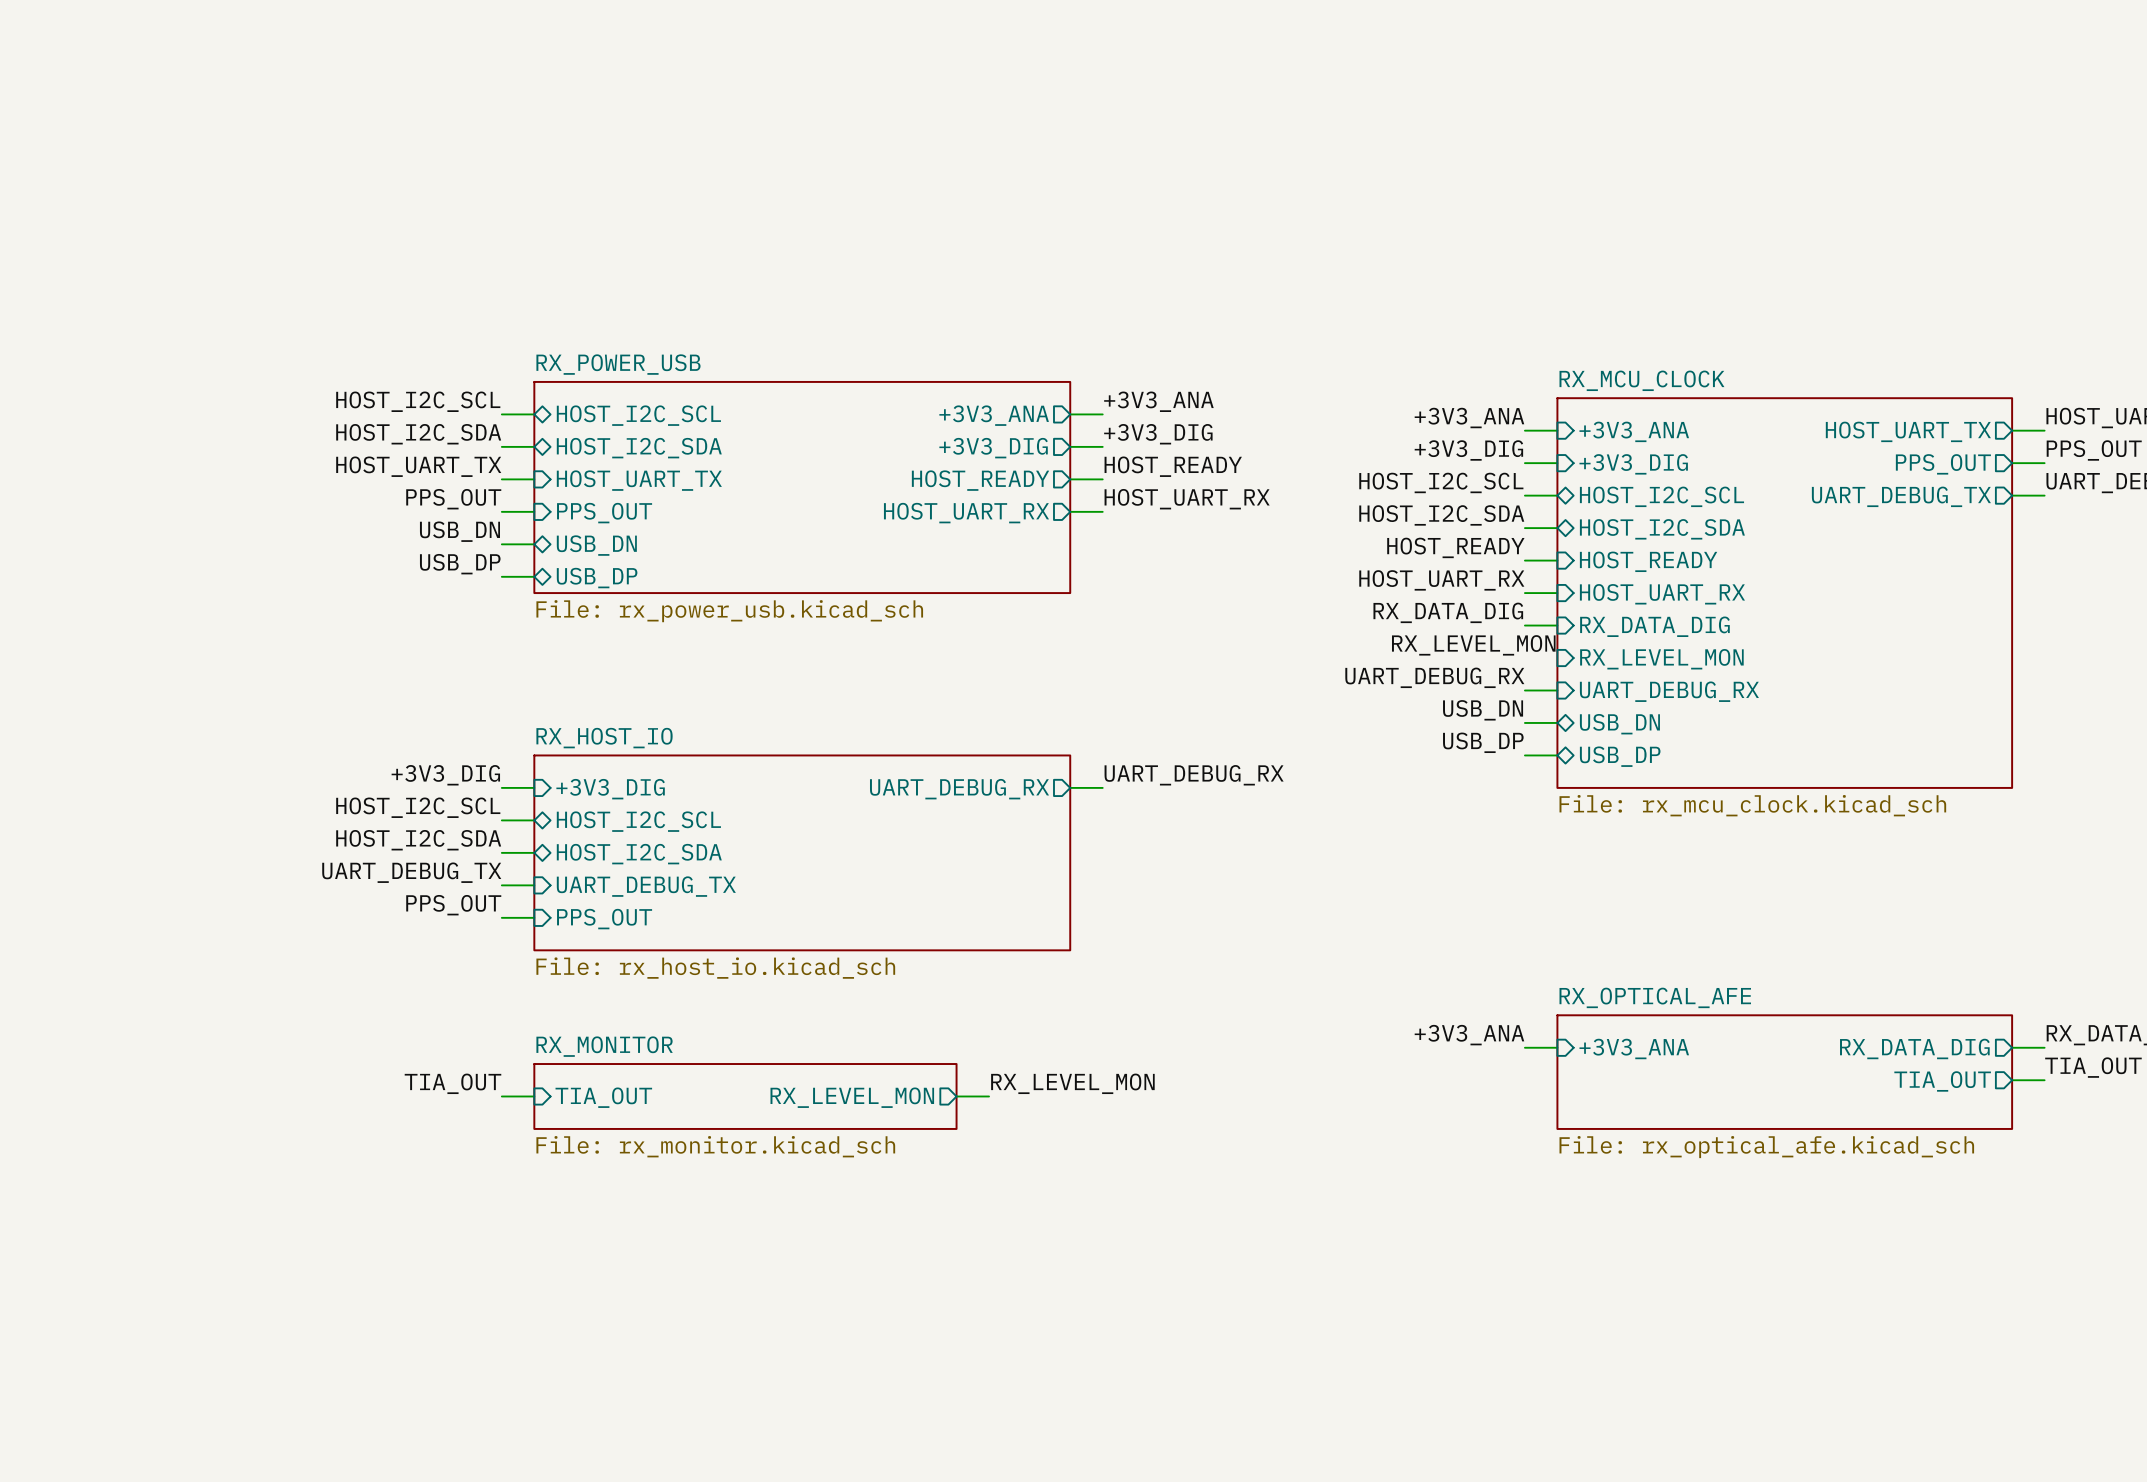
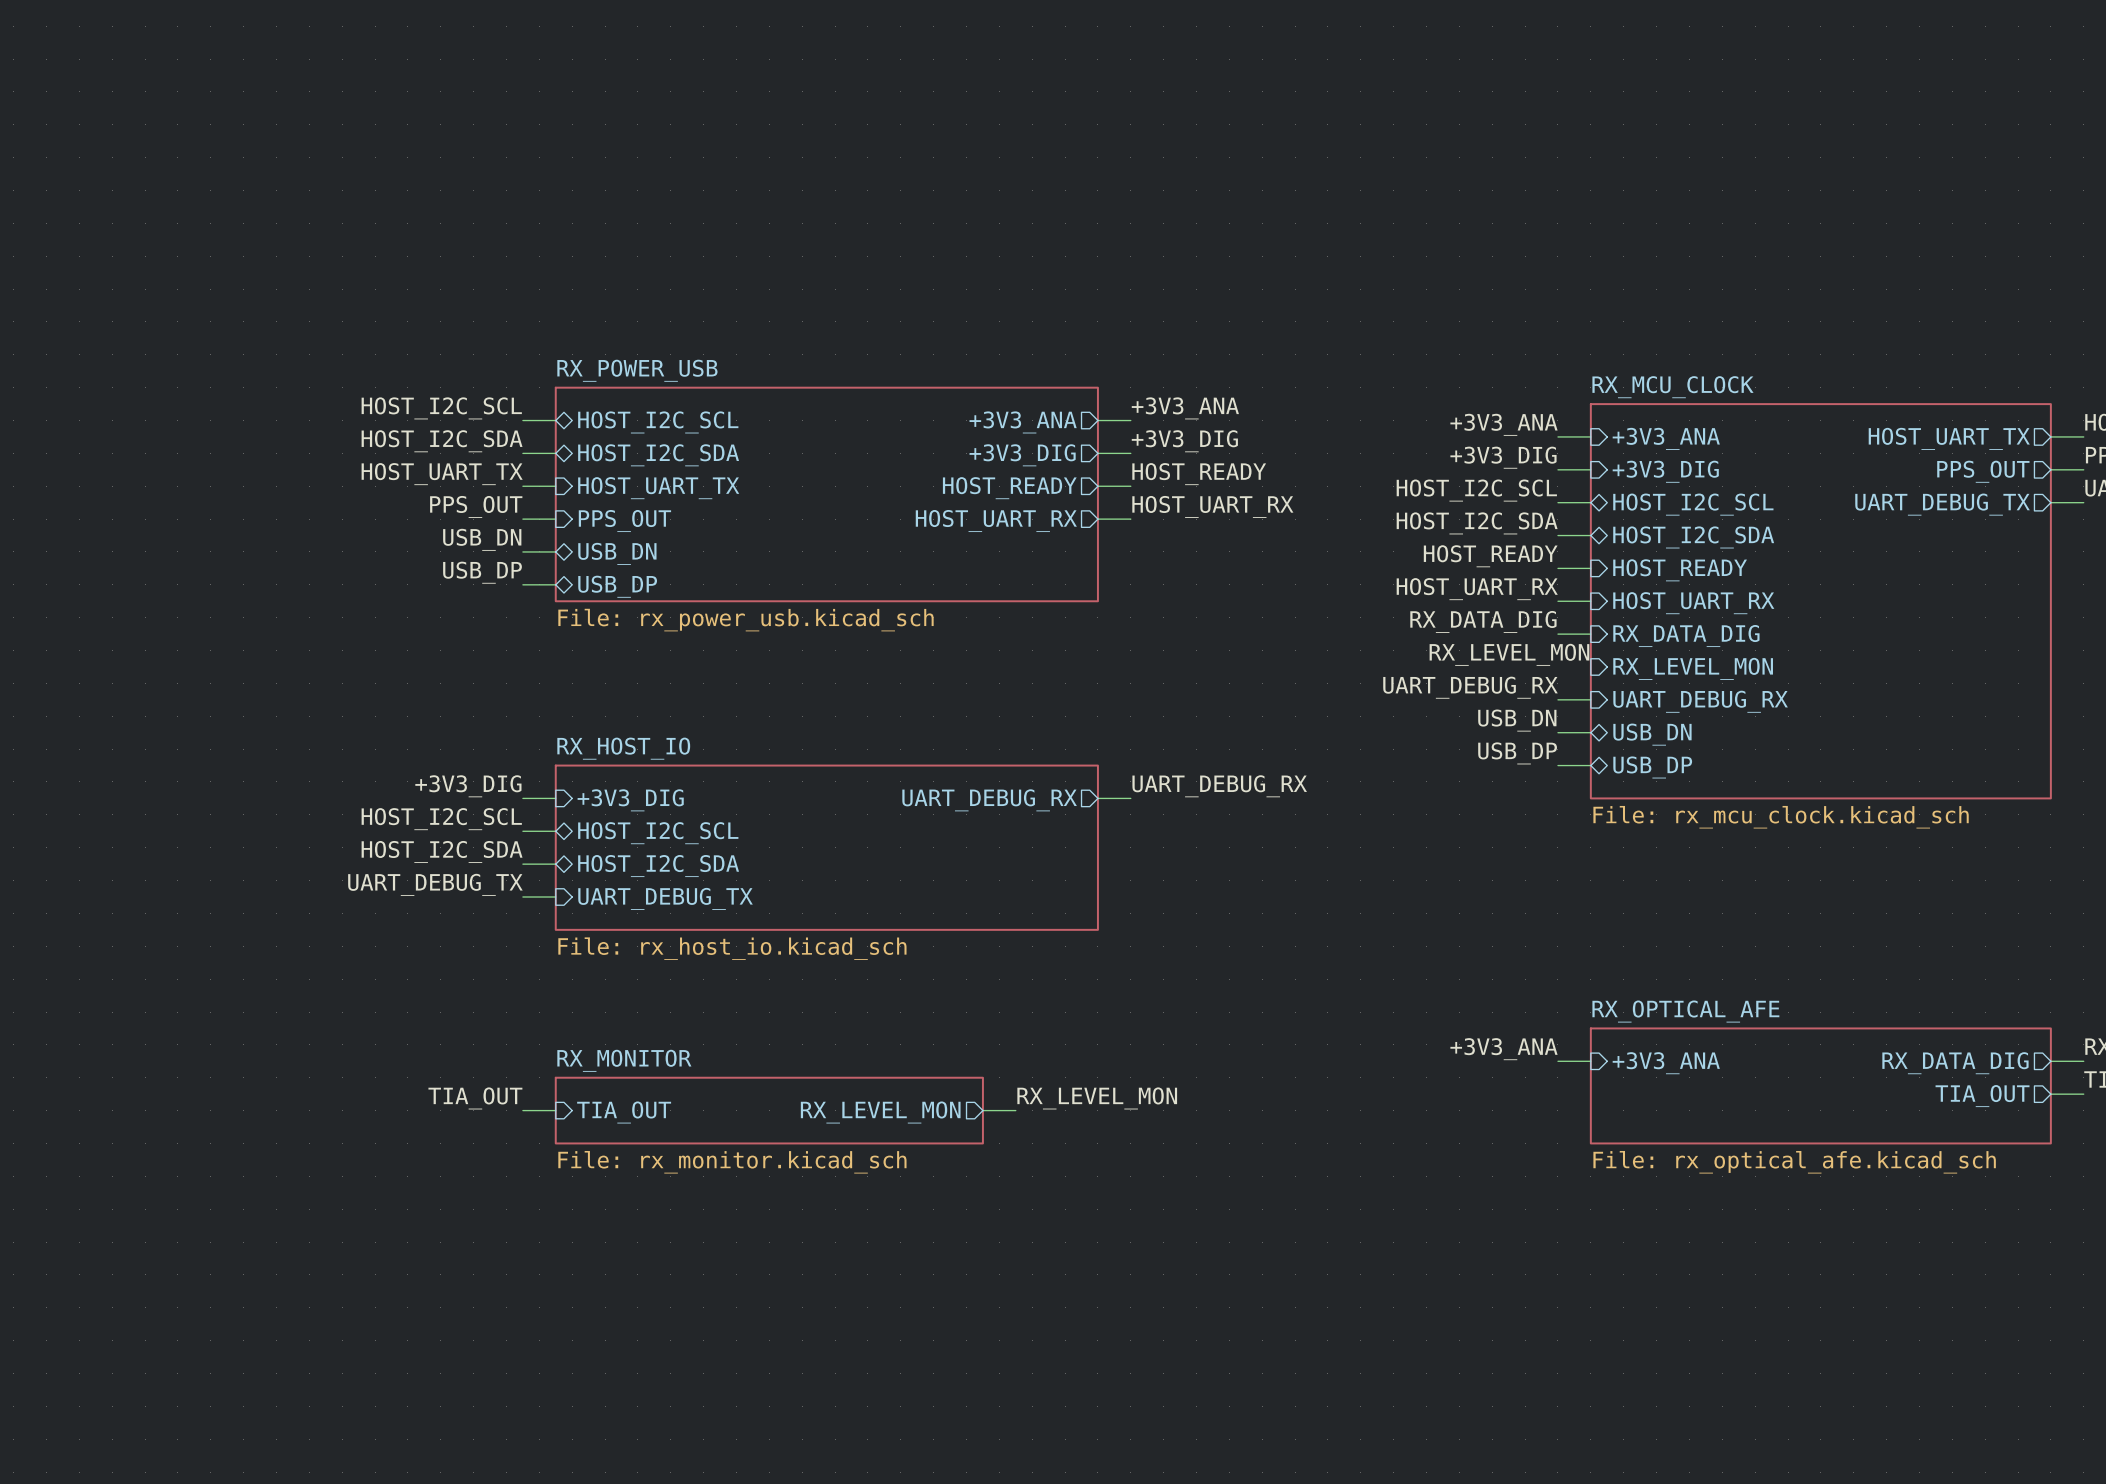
sheet RX_HOST_IO: none -> File: rx_host_io.kicad_sch (826, 847)
sheet RX_HOST_IO: File: rx_host_io.kicad_sch (802, 852) -> none
label: PPS_OUT (453, 905) -> none
wire: (501, 917) (534, 917) -> none
sheet pin: PPS_OUT (604, 919) -> none

